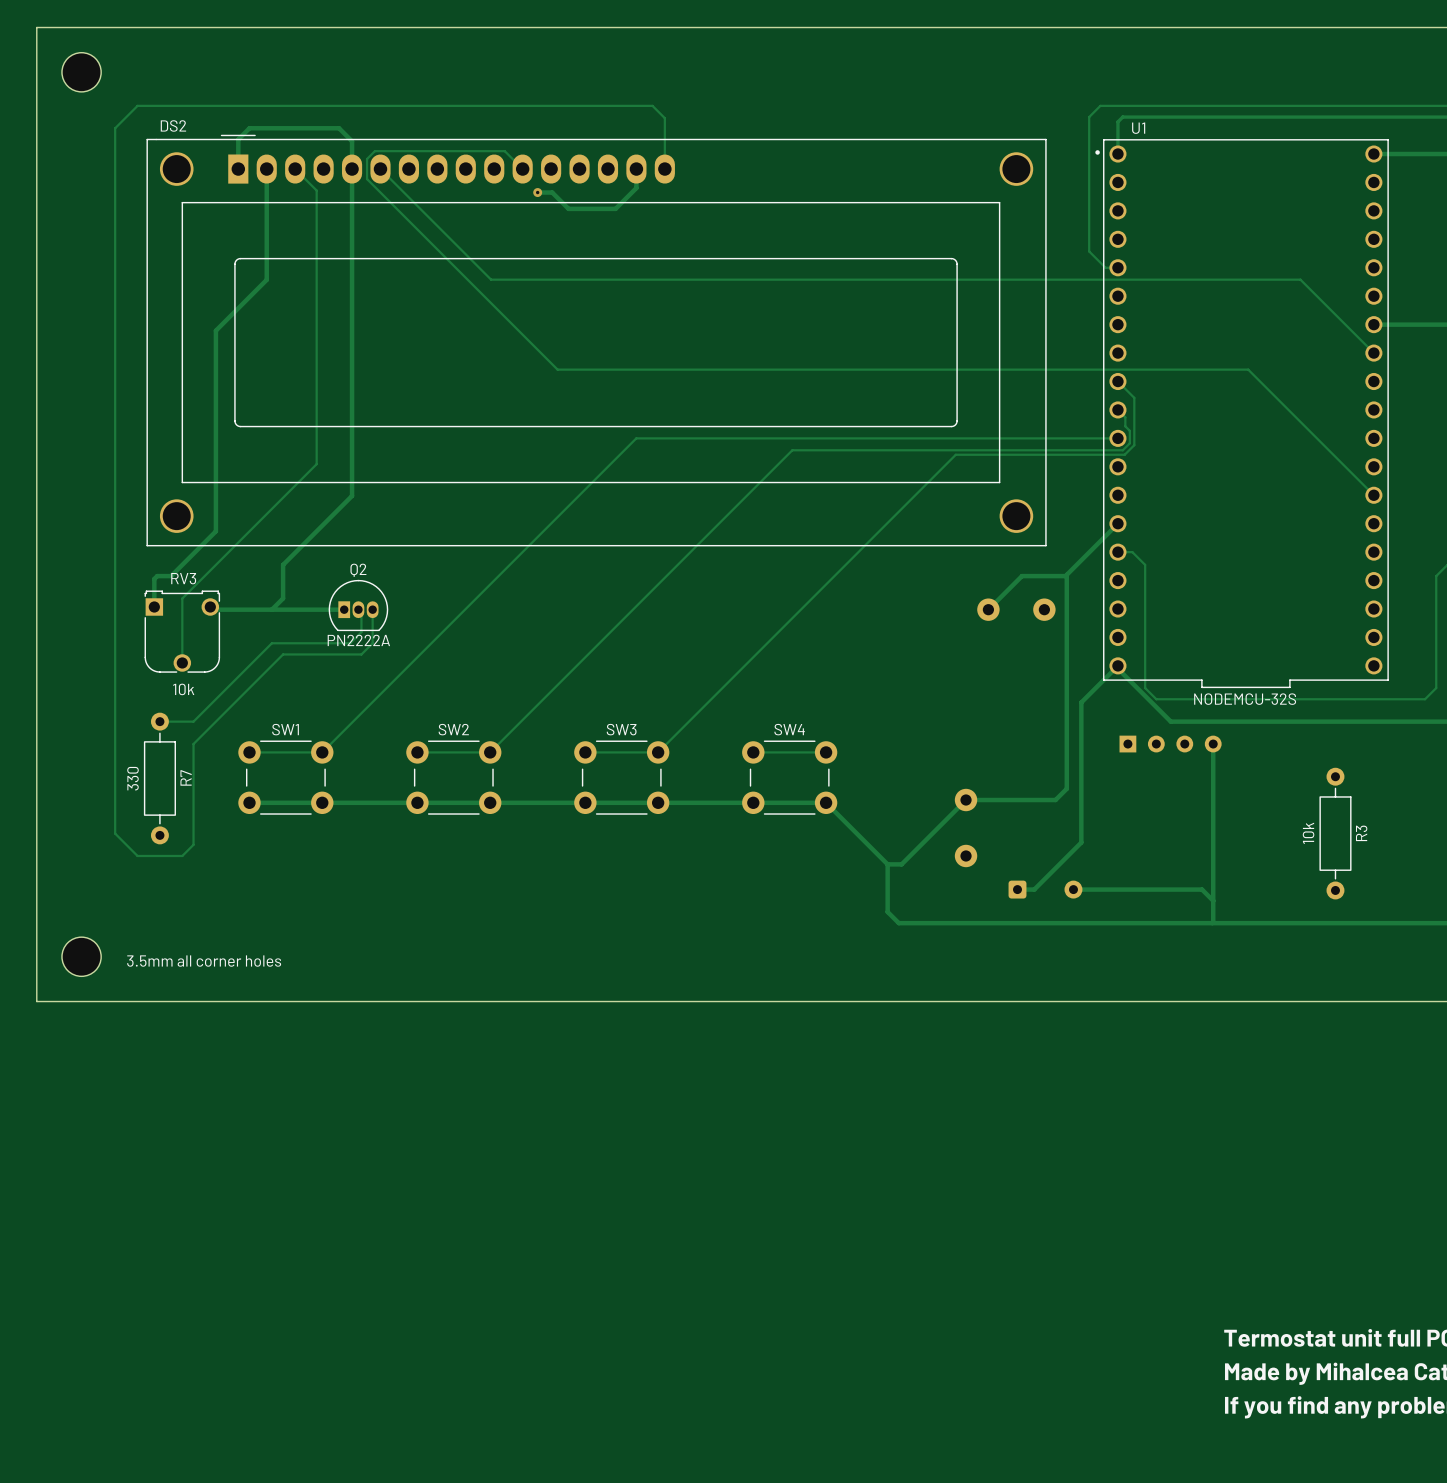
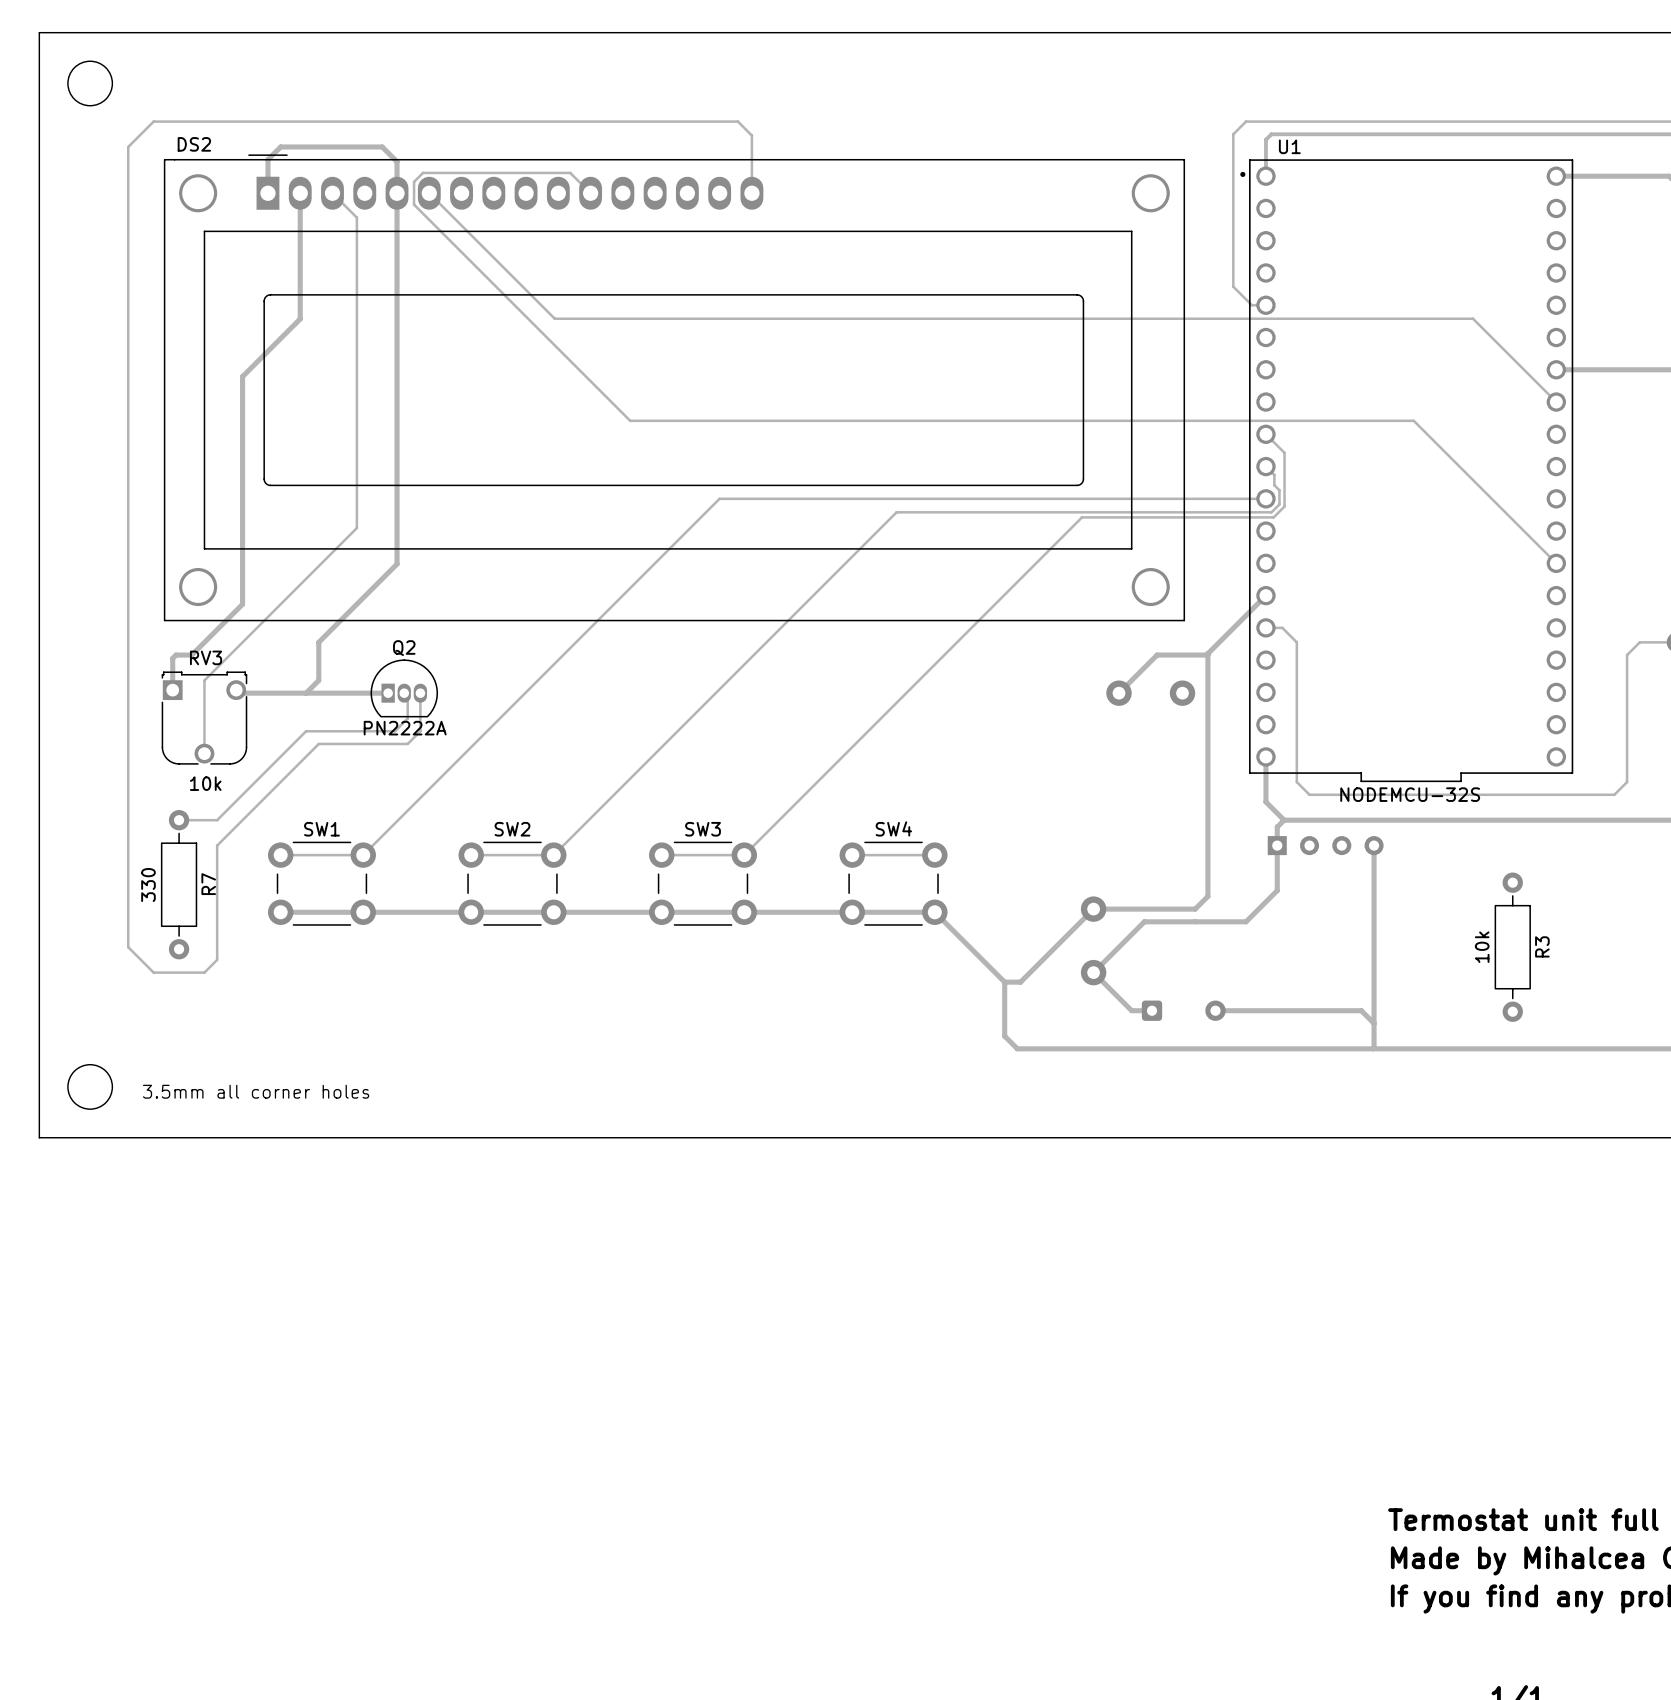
track: (636, 169) (636, 188) (615, 208) (568, 208) (552, 192) (537, 192) -> none
via: (537, 192) -> none
track: (1117, 665) (1081, 702) (1081, 842) (1034, 889) (1017, 889) -> (1284, 820) (1277, 827) (1277, 890) (1246, 921) (1144, 921) (1093, 972) (1131, 1010) (1151, 1010)
track: (1117, 668) (1170, 721) -> (1265, 760) (1265, 802) (1284, 820)
track: none -> (1284, 820) (1325, 820)

